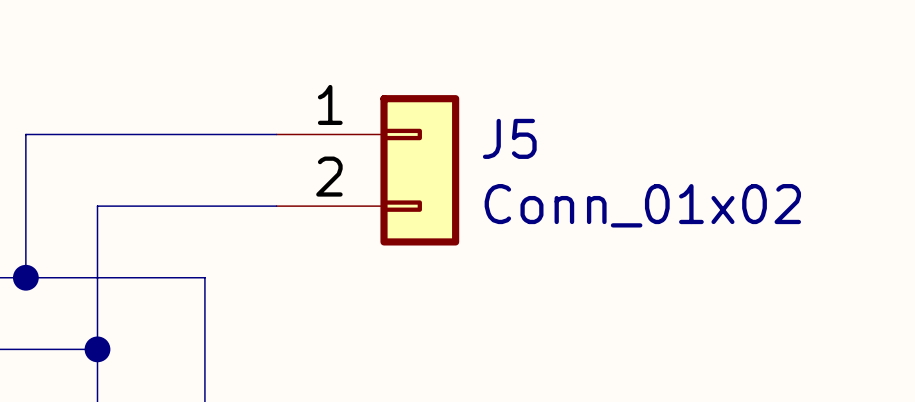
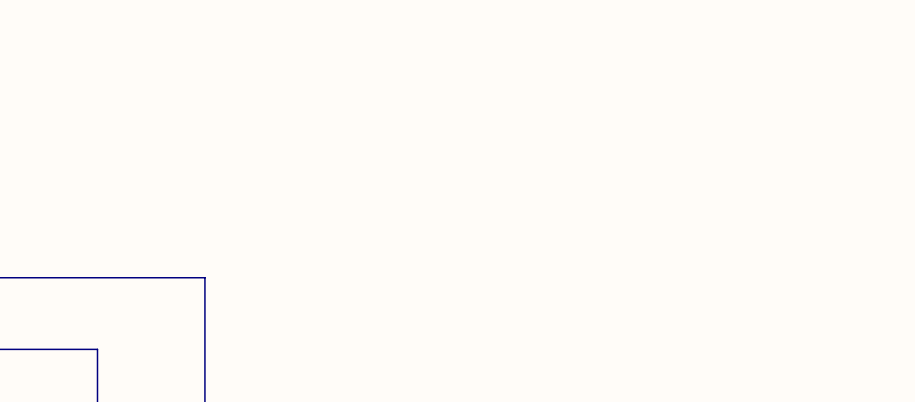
wire: (276, 134) (25, 134) (25, 277) -> none
J5: Conn_01x02 (367, 170) -> none
wire: (276, 206) (97, 206) (97, 349) -> none
junction: (25, 277) -> none
junction: (97, 349) -> none

